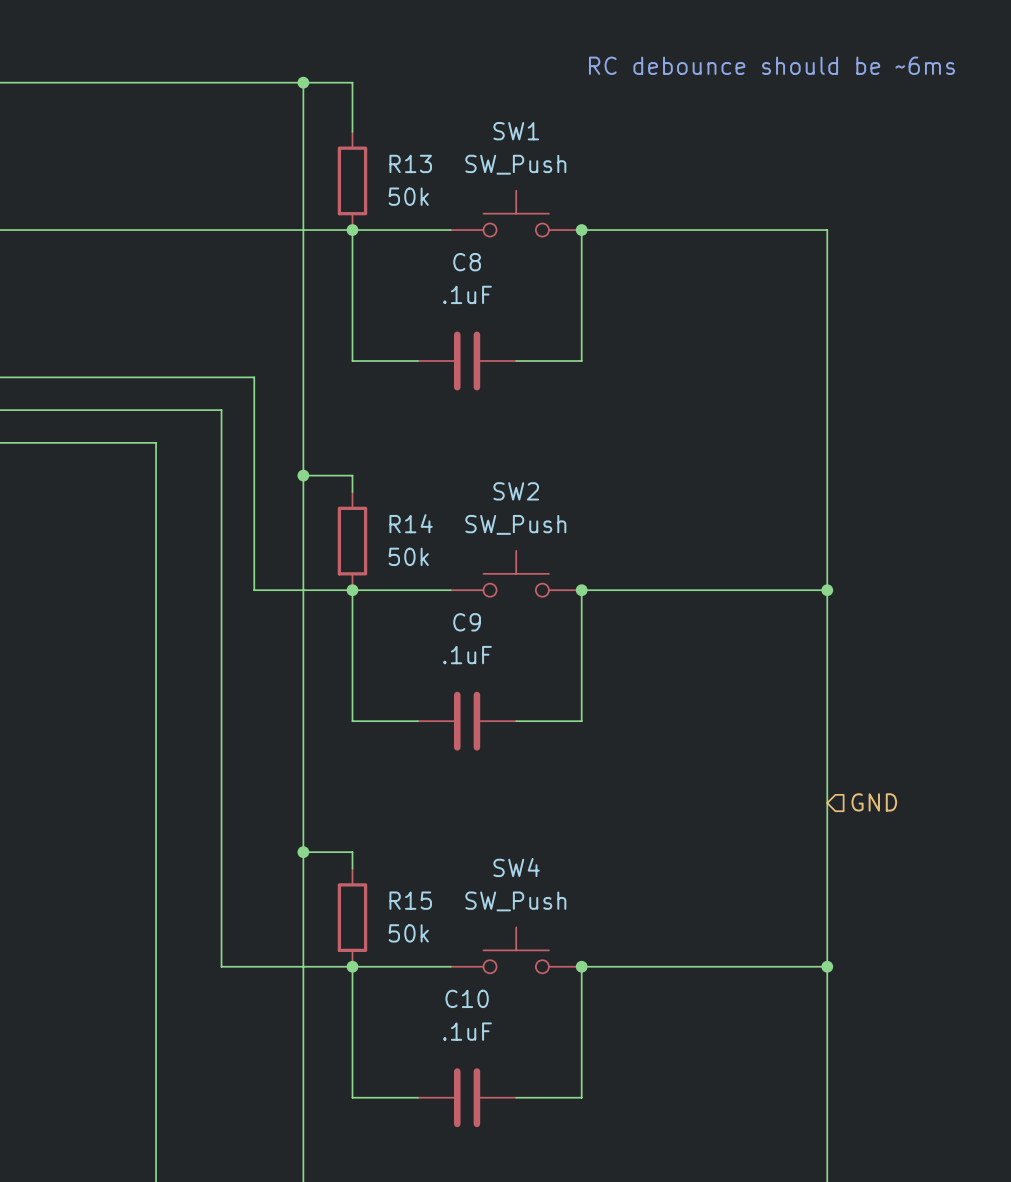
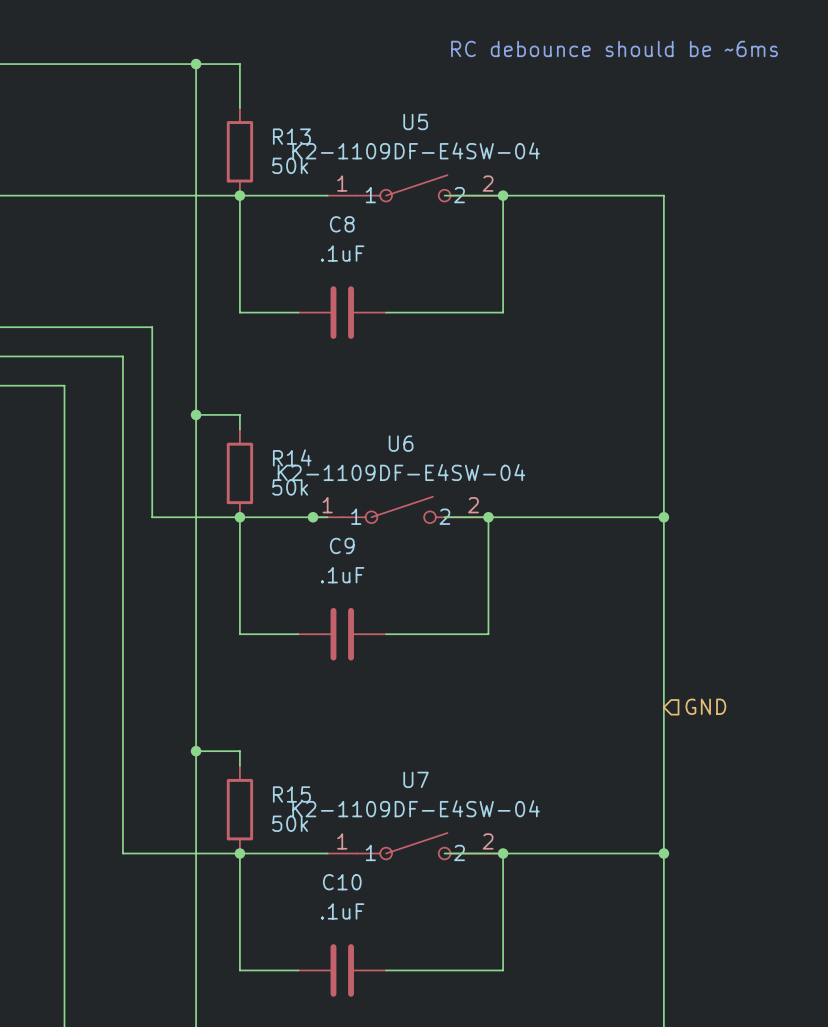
SW1: SW_Push (516, 213) -> none
U5: none -> K2-1109DF-E4SW-04 (415, 188)
wire: (581, 230) (581, 361) -> (503, 195) (503, 312) (444, 312)
junction position: (581, 230) -> (503, 195)
SW2: SW_Push (516, 573) -> none
U6: none -> K2-1109DF-E4SW-04 (400, 509)
junction: none -> (313, 517)
wire: (581, 590) (581, 721) -> (488, 517) (488, 634) (444, 634)
junction position: (581, 590) -> (488, 517)
SW4: SW_Push (516, 950) -> none
U7: none -> K2-1109DF-E4SW-04 (415, 846)
wire: (581, 966) (581, 1097) -> (503, 853) (503, 970) (444, 970)
junction position: (581, 966) -> (503, 853)

